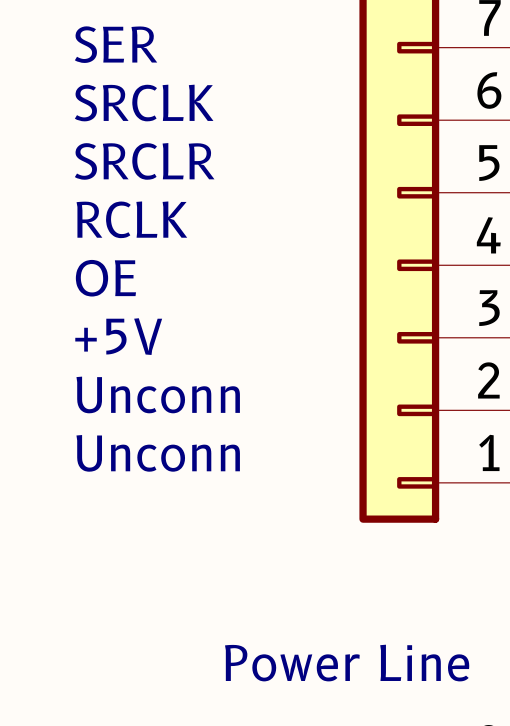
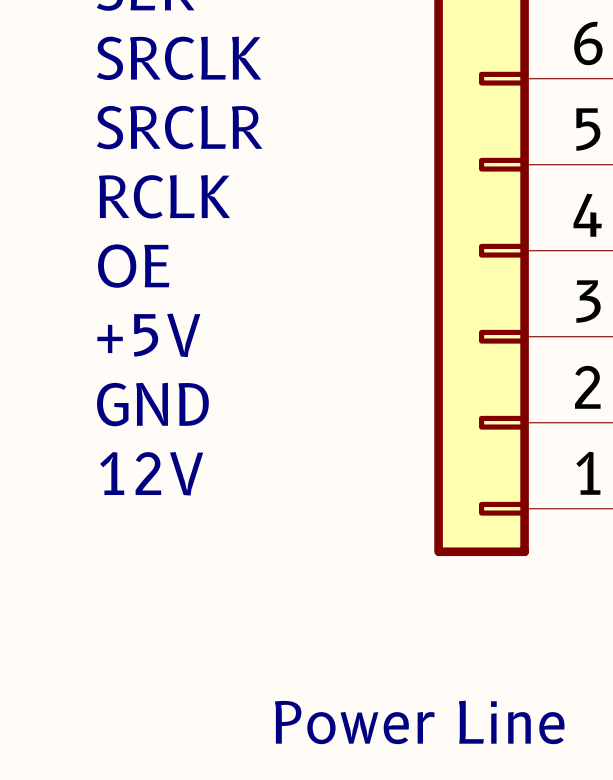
text: Unconn (158, 394) -> GND (152, 404)
text: Unconn (158, 453) -> 12V (151, 473)

